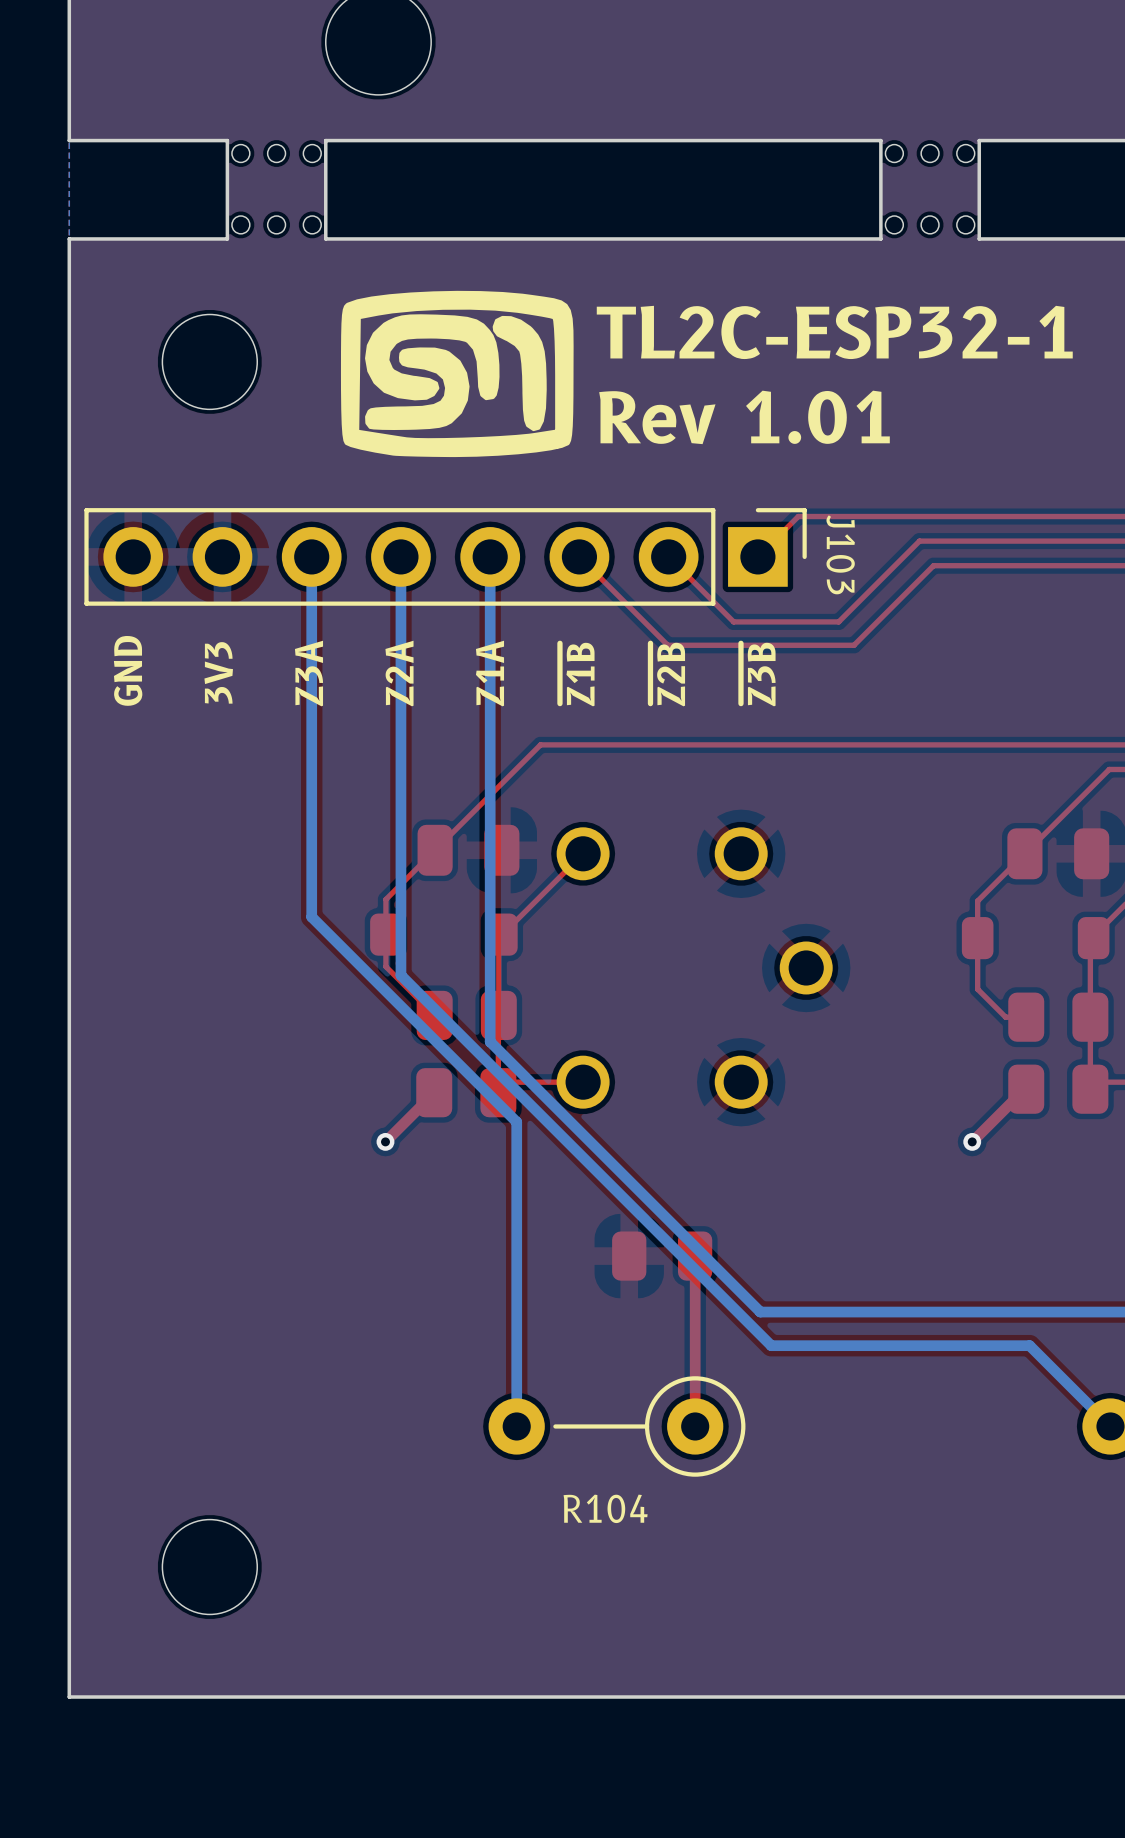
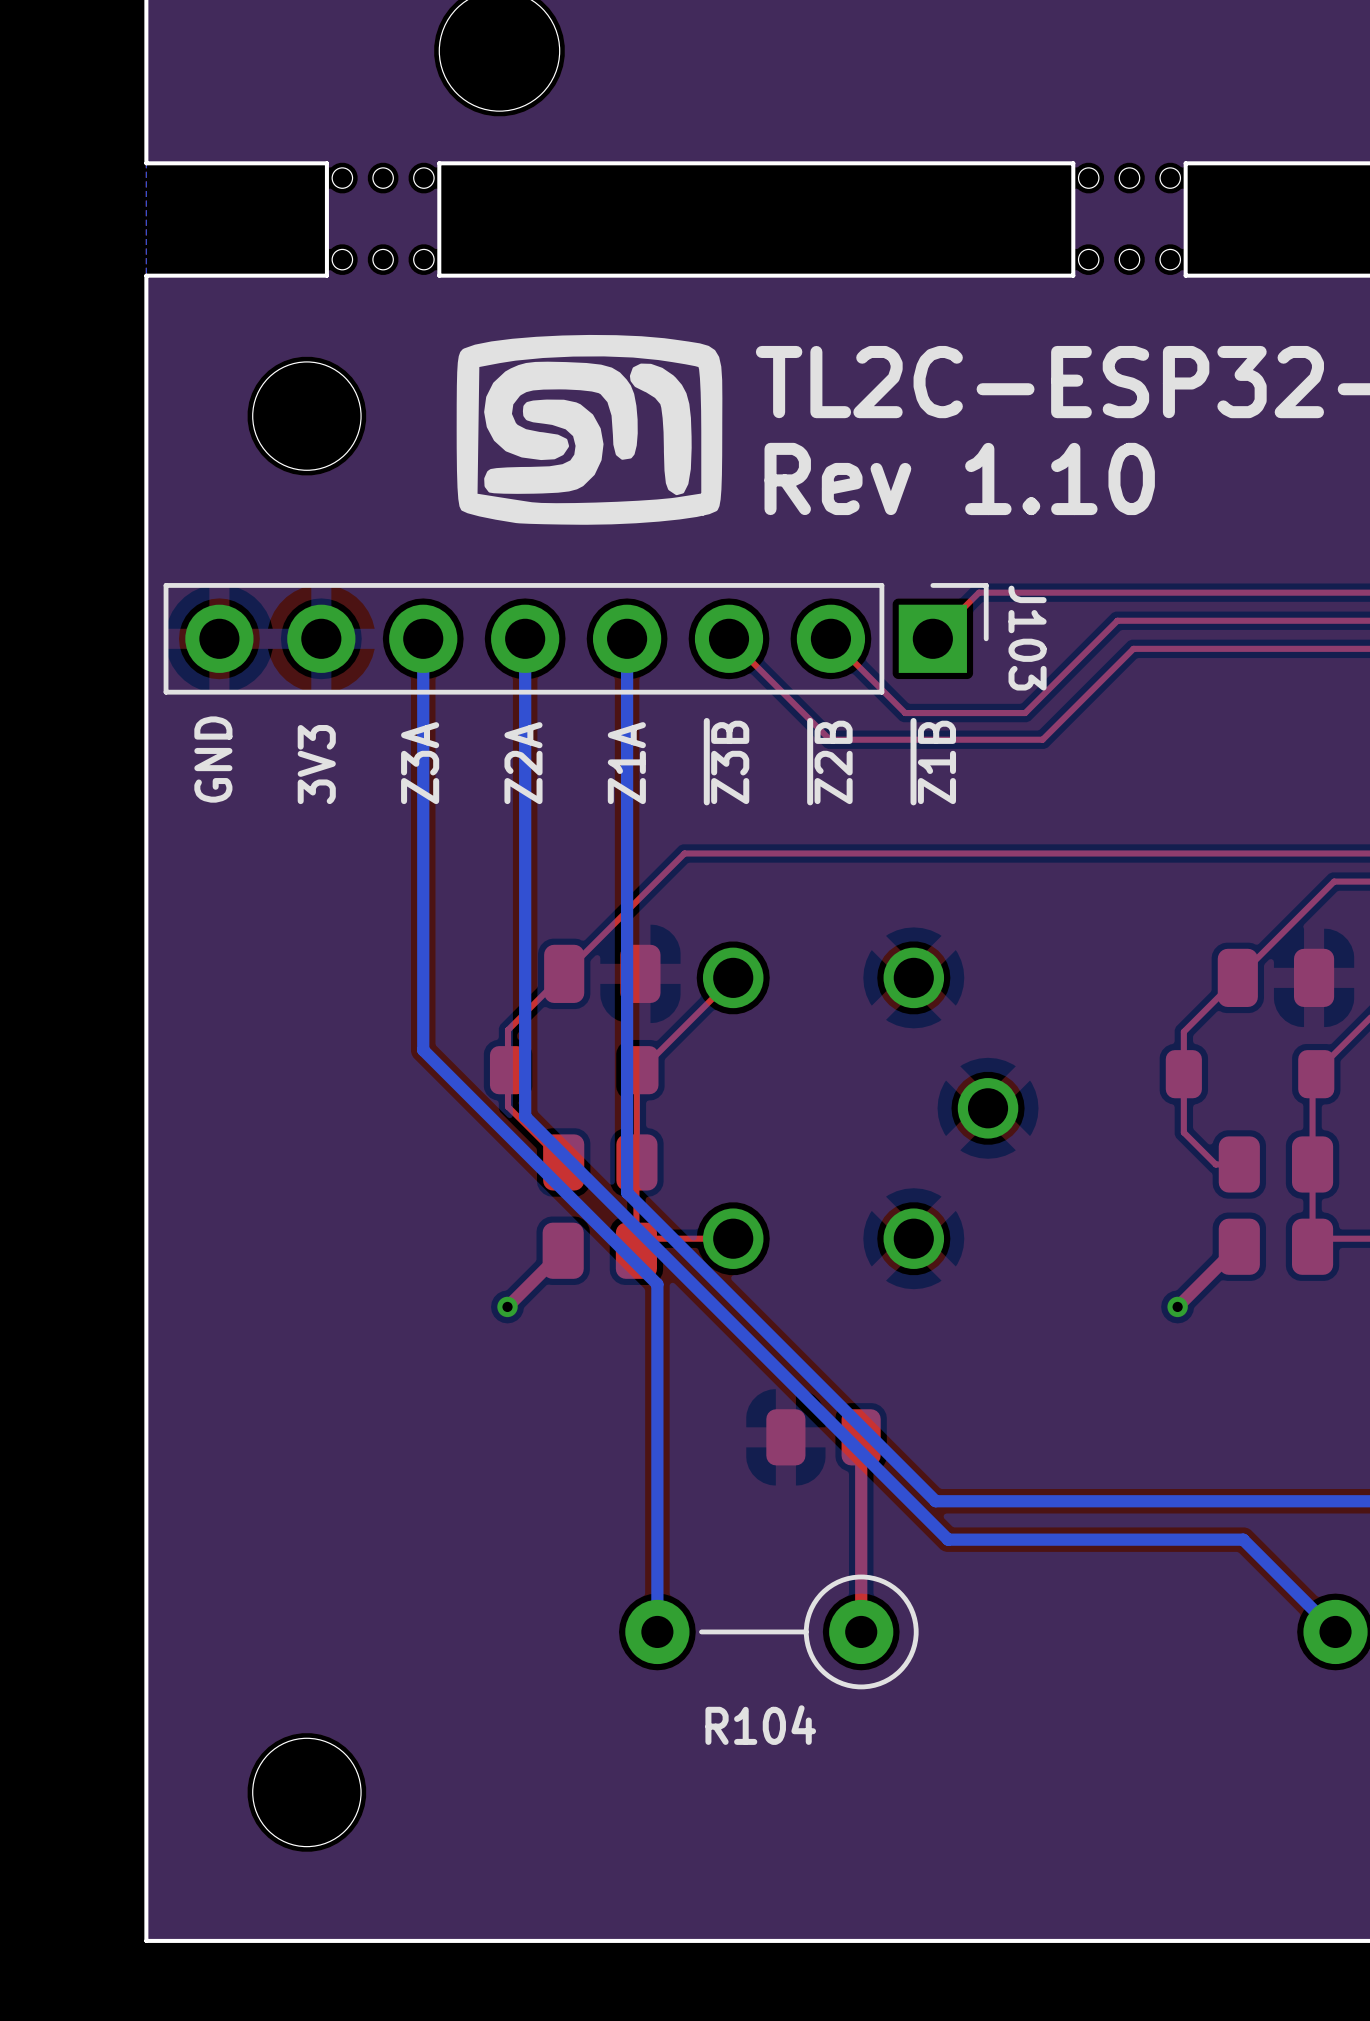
text: Rev 1.01 (744, 417) -> Rev 1.10 (959, 478)
text: ~{Z1B} (577, 674) -> ~{Z3B} (726, 761)
text: ~{Z3B} (758, 674) -> ~{Z1B} (933, 761)

